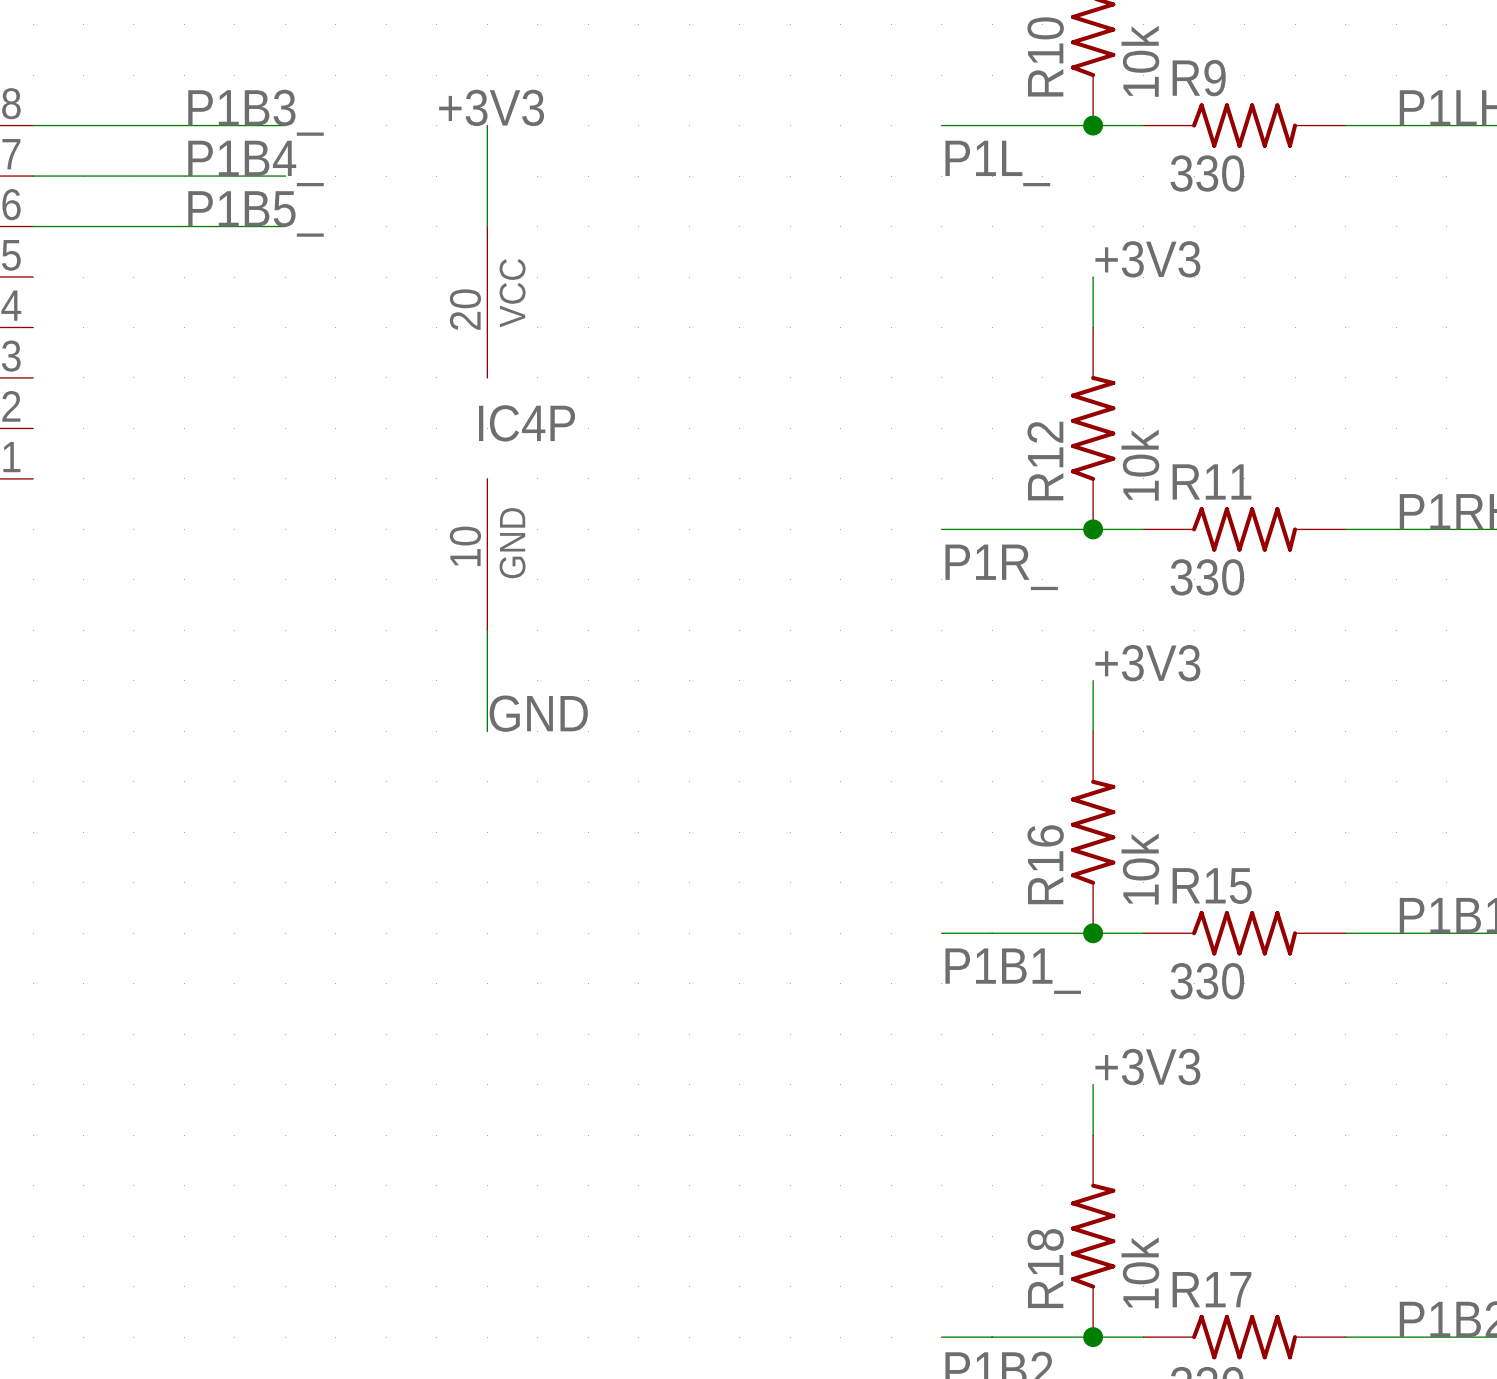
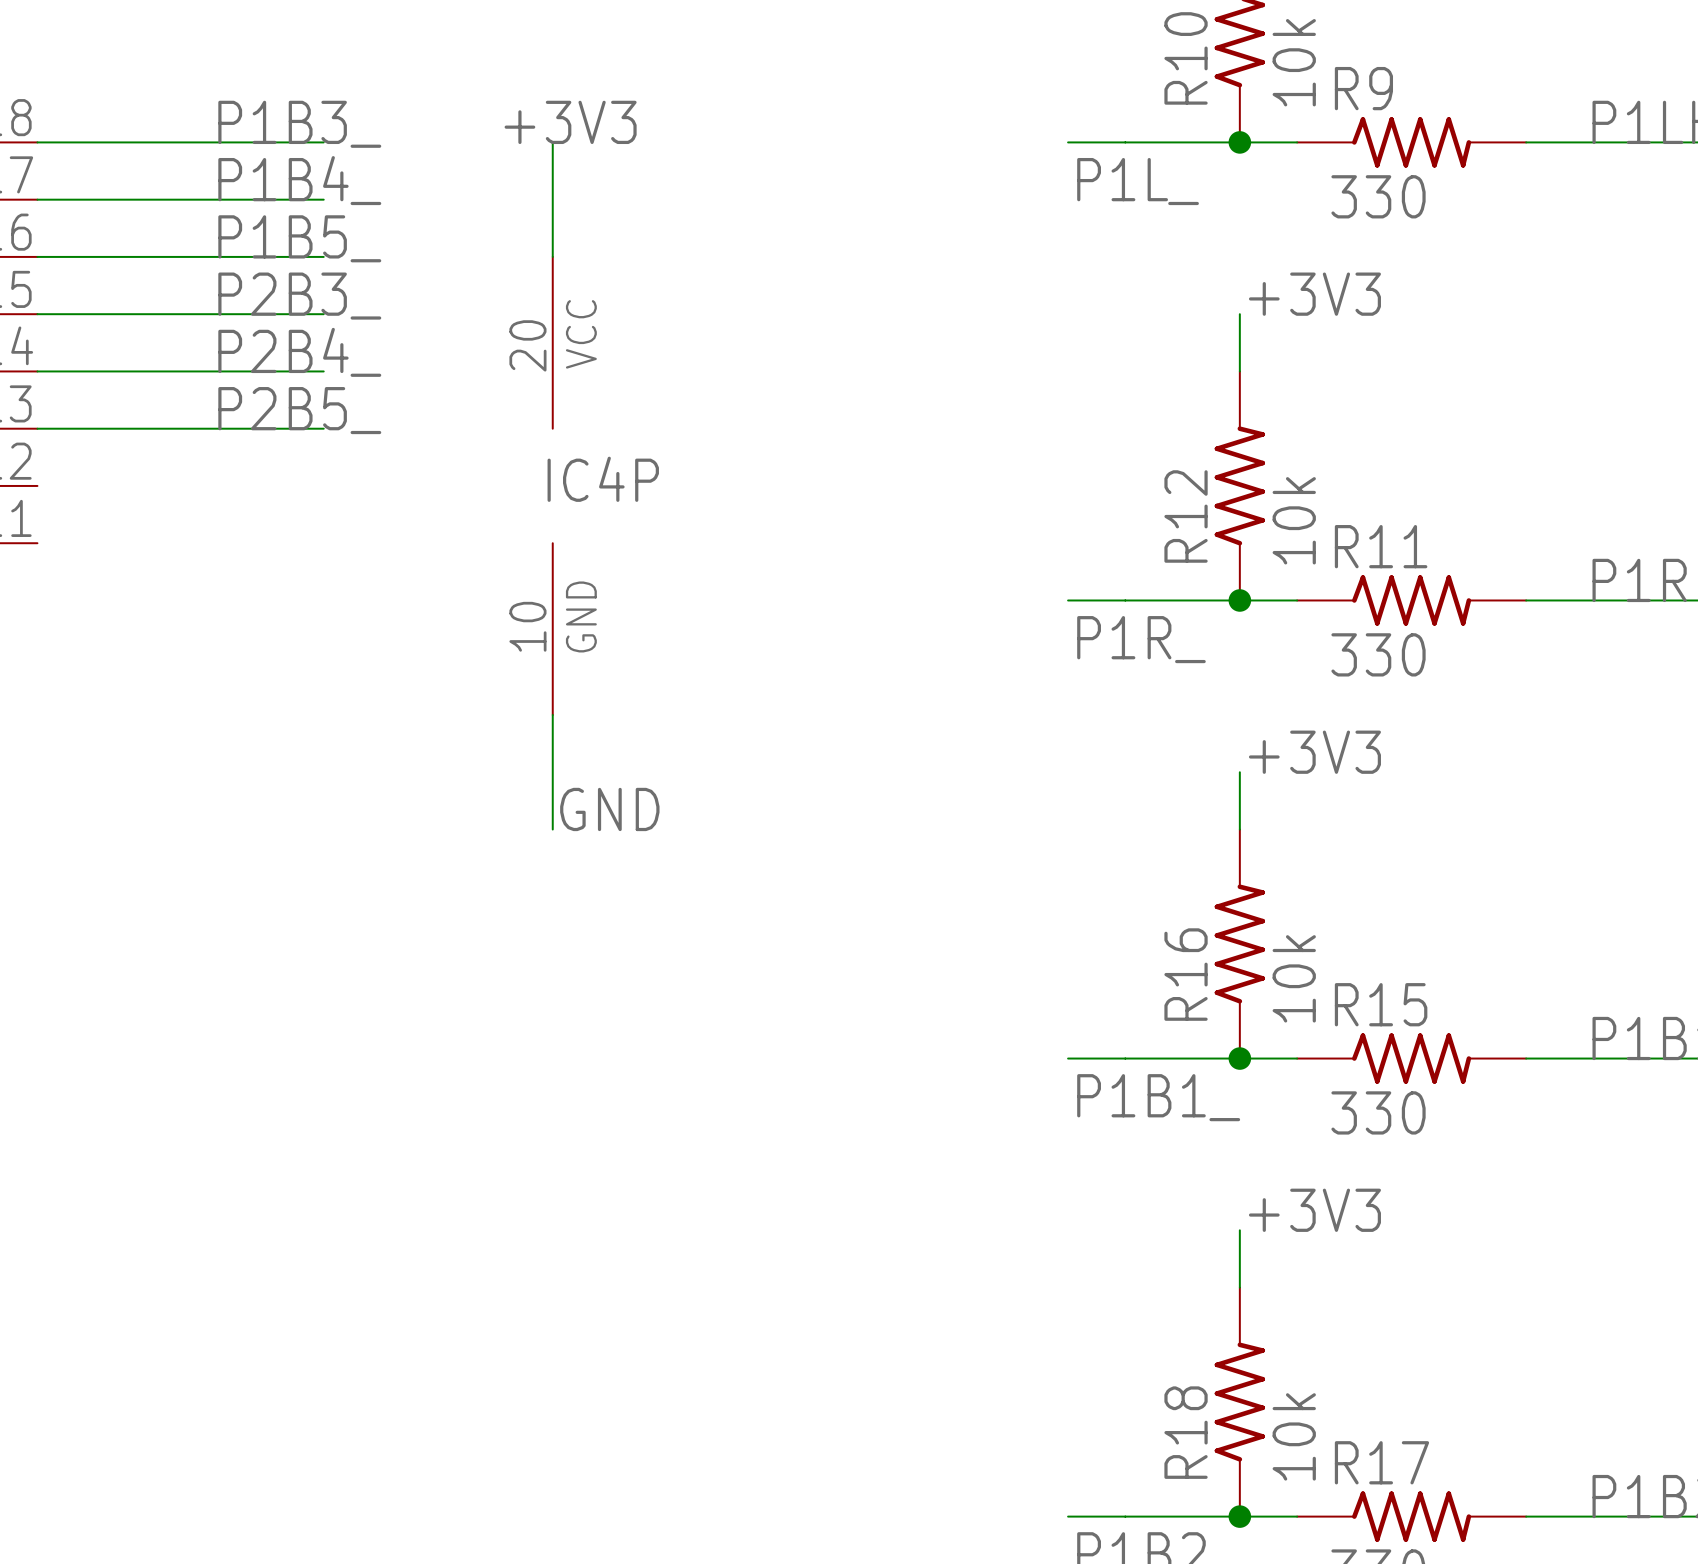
label: none -> P2B3_ (299, 296)
wire: none -> (37, 314) (323, 314)
label: none -> P2B4_ (299, 352)
wire: none -> (37, 371) (323, 371)
label: none -> P2B5_ (299, 410)
wire: none -> (37, 428) (323, 428)

